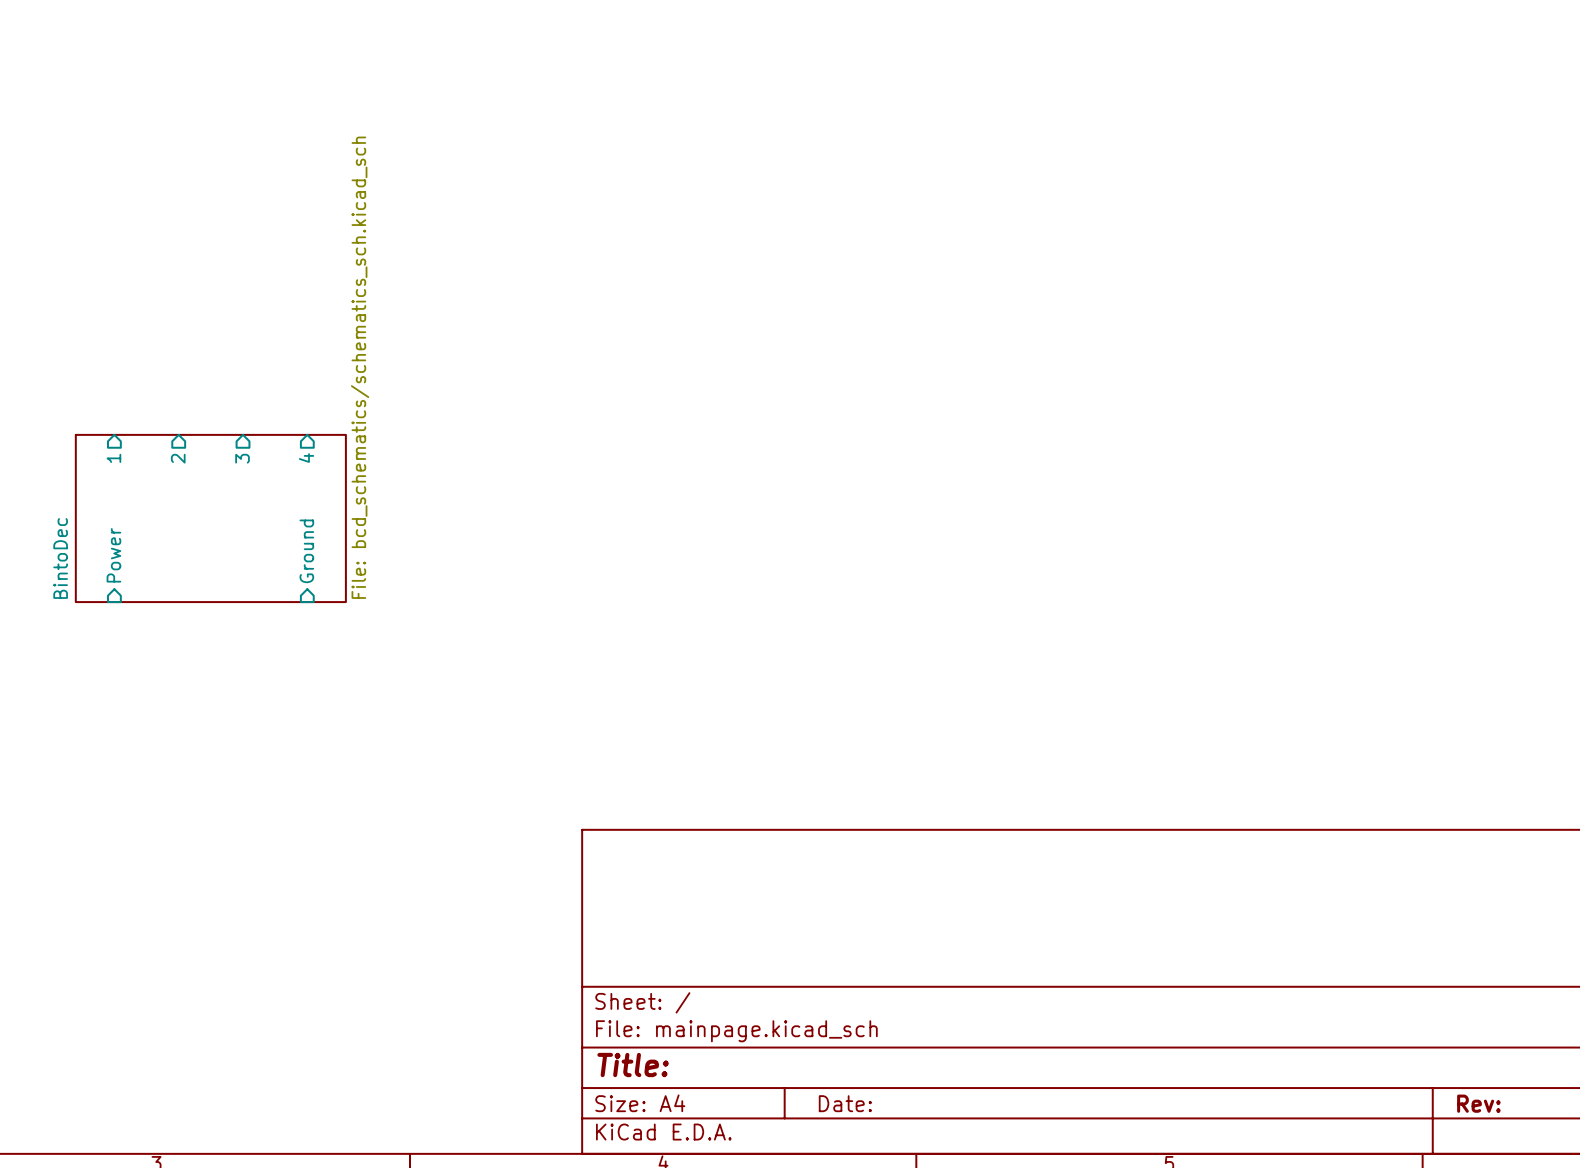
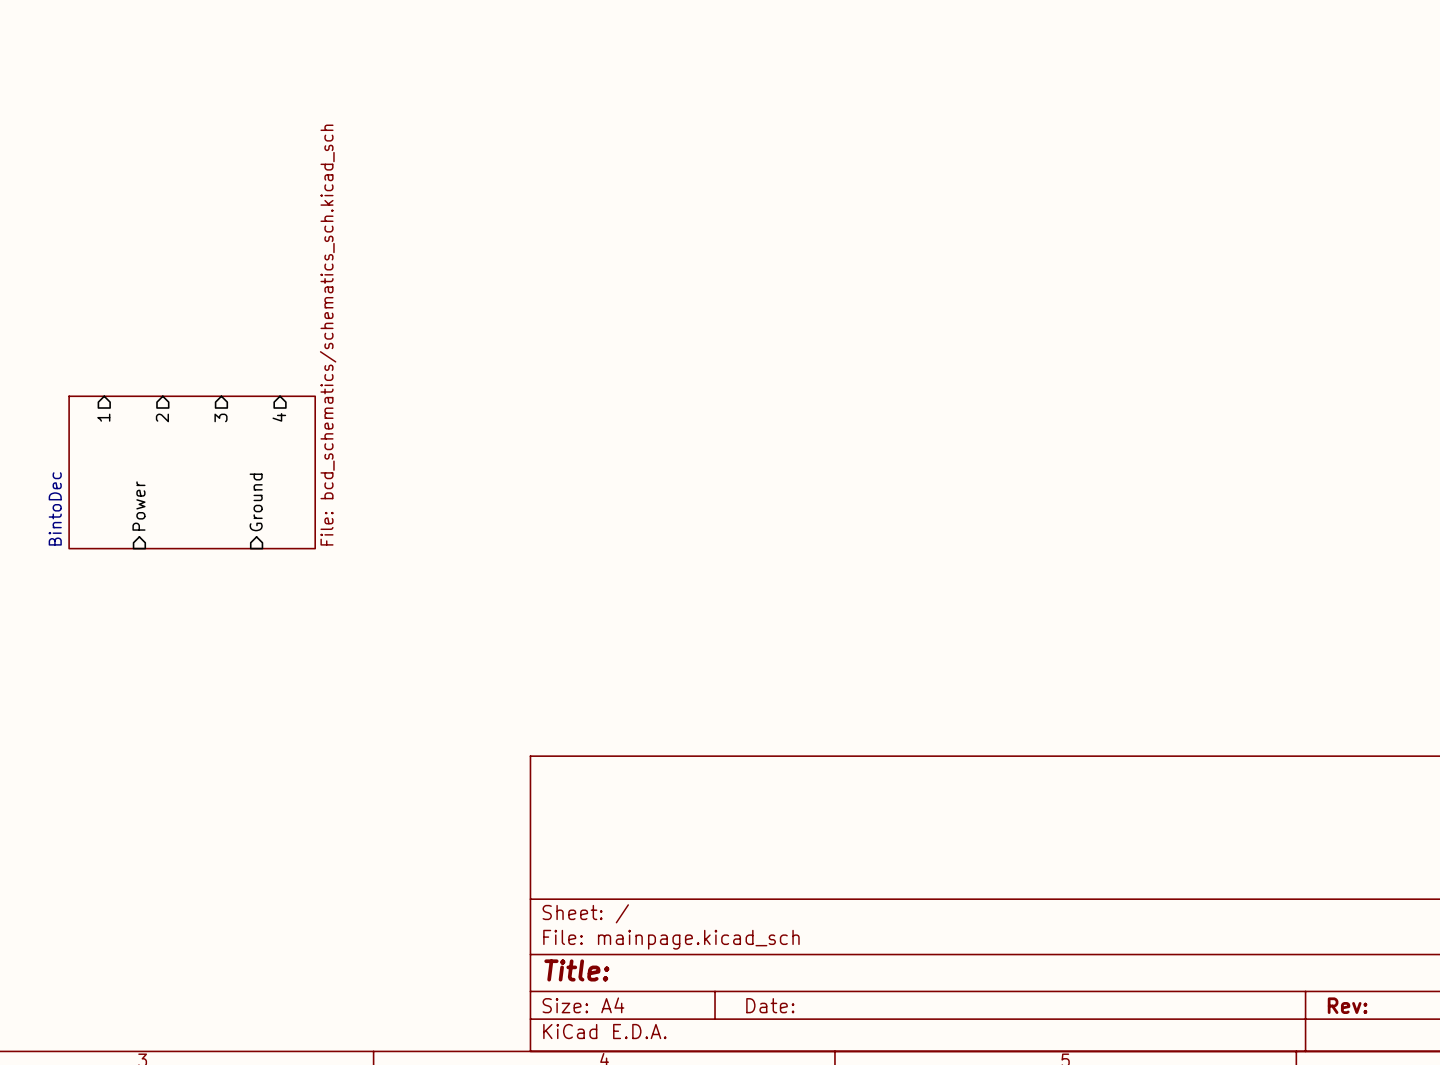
sheet pin position: Ground (306, 551) -> Ground (256, 502)
sheet pin position: Power (113, 555) -> Power (138, 506)

